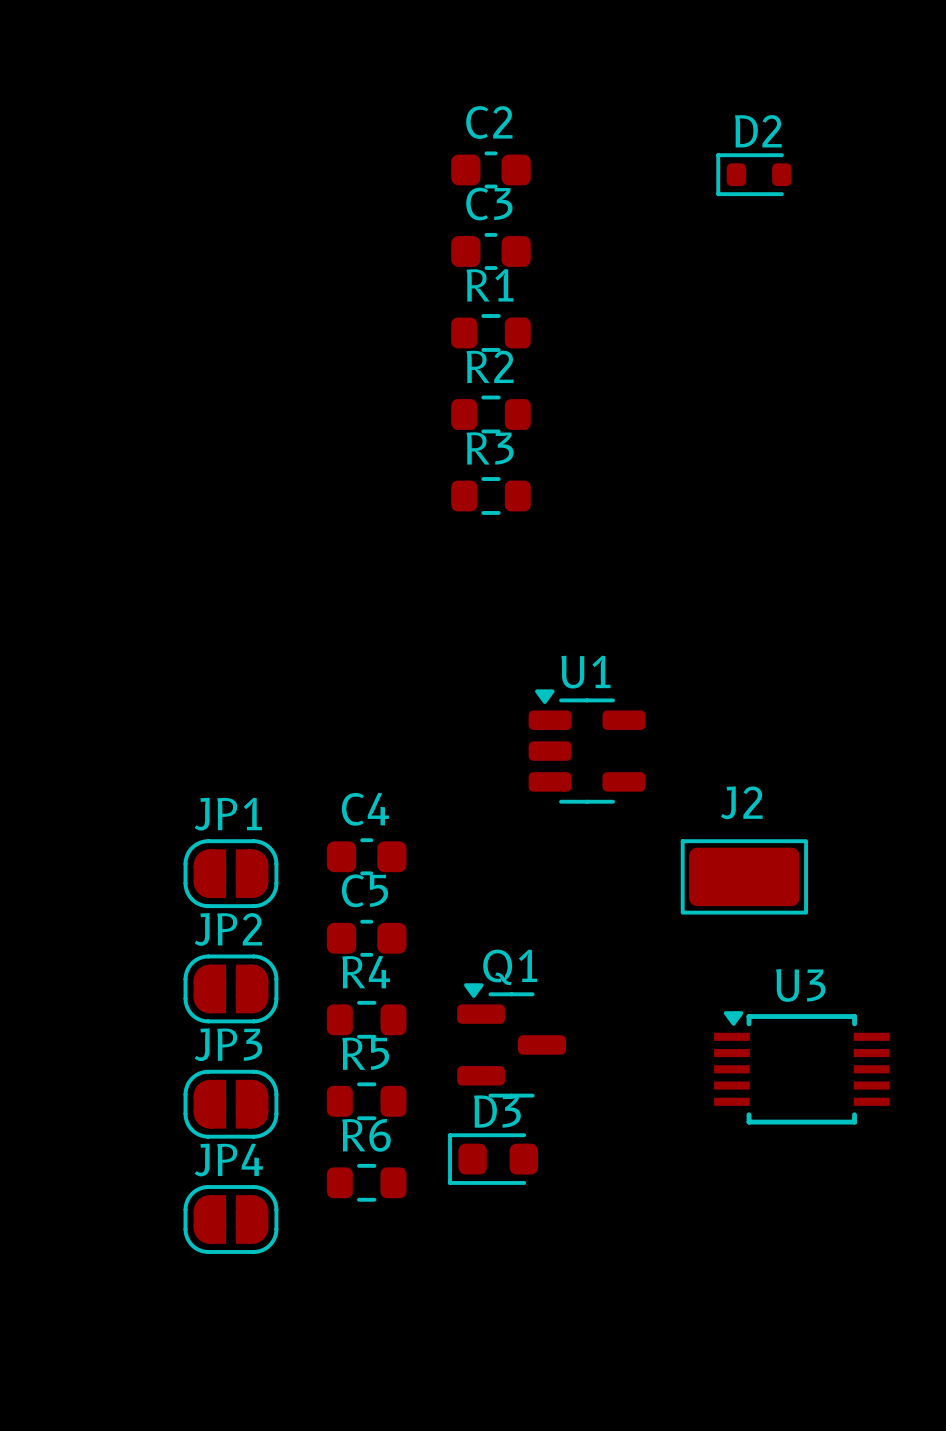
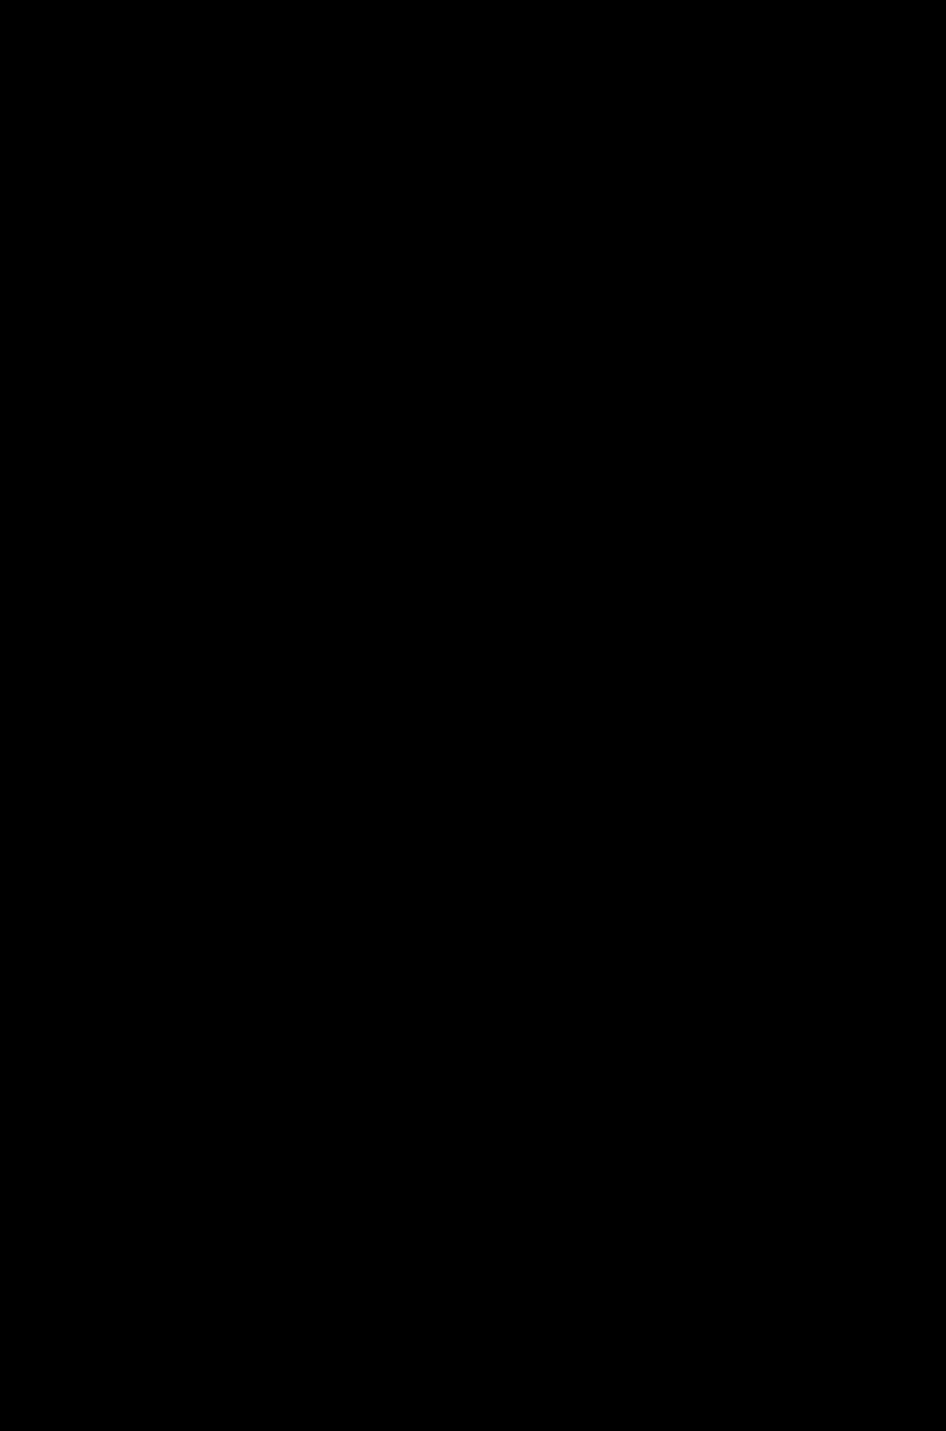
C2: (491, 169) -> none
D2: (753, 174) -> none
C3: (491, 251) -> none
R1: (491, 332) -> none
R2: (491, 414) -> none
R3: (491, 495) -> none
U1: (587, 746) -> none
C4: (366, 856) -> none
JP1: (230, 873) -> none
J2: (744, 876) -> none
C5: (366, 938) -> none
JP2: (230, 988) -> none
R4: (366, 1019) -> none
Q1: (511, 1040) -> none
U3: (801, 1067) -> none
R5: (366, 1101) -> none
JP3: (230, 1104) -> none
D3: (493, 1159) -> none
R6: (366, 1182) -> none
JP4: (230, 1219) -> none

